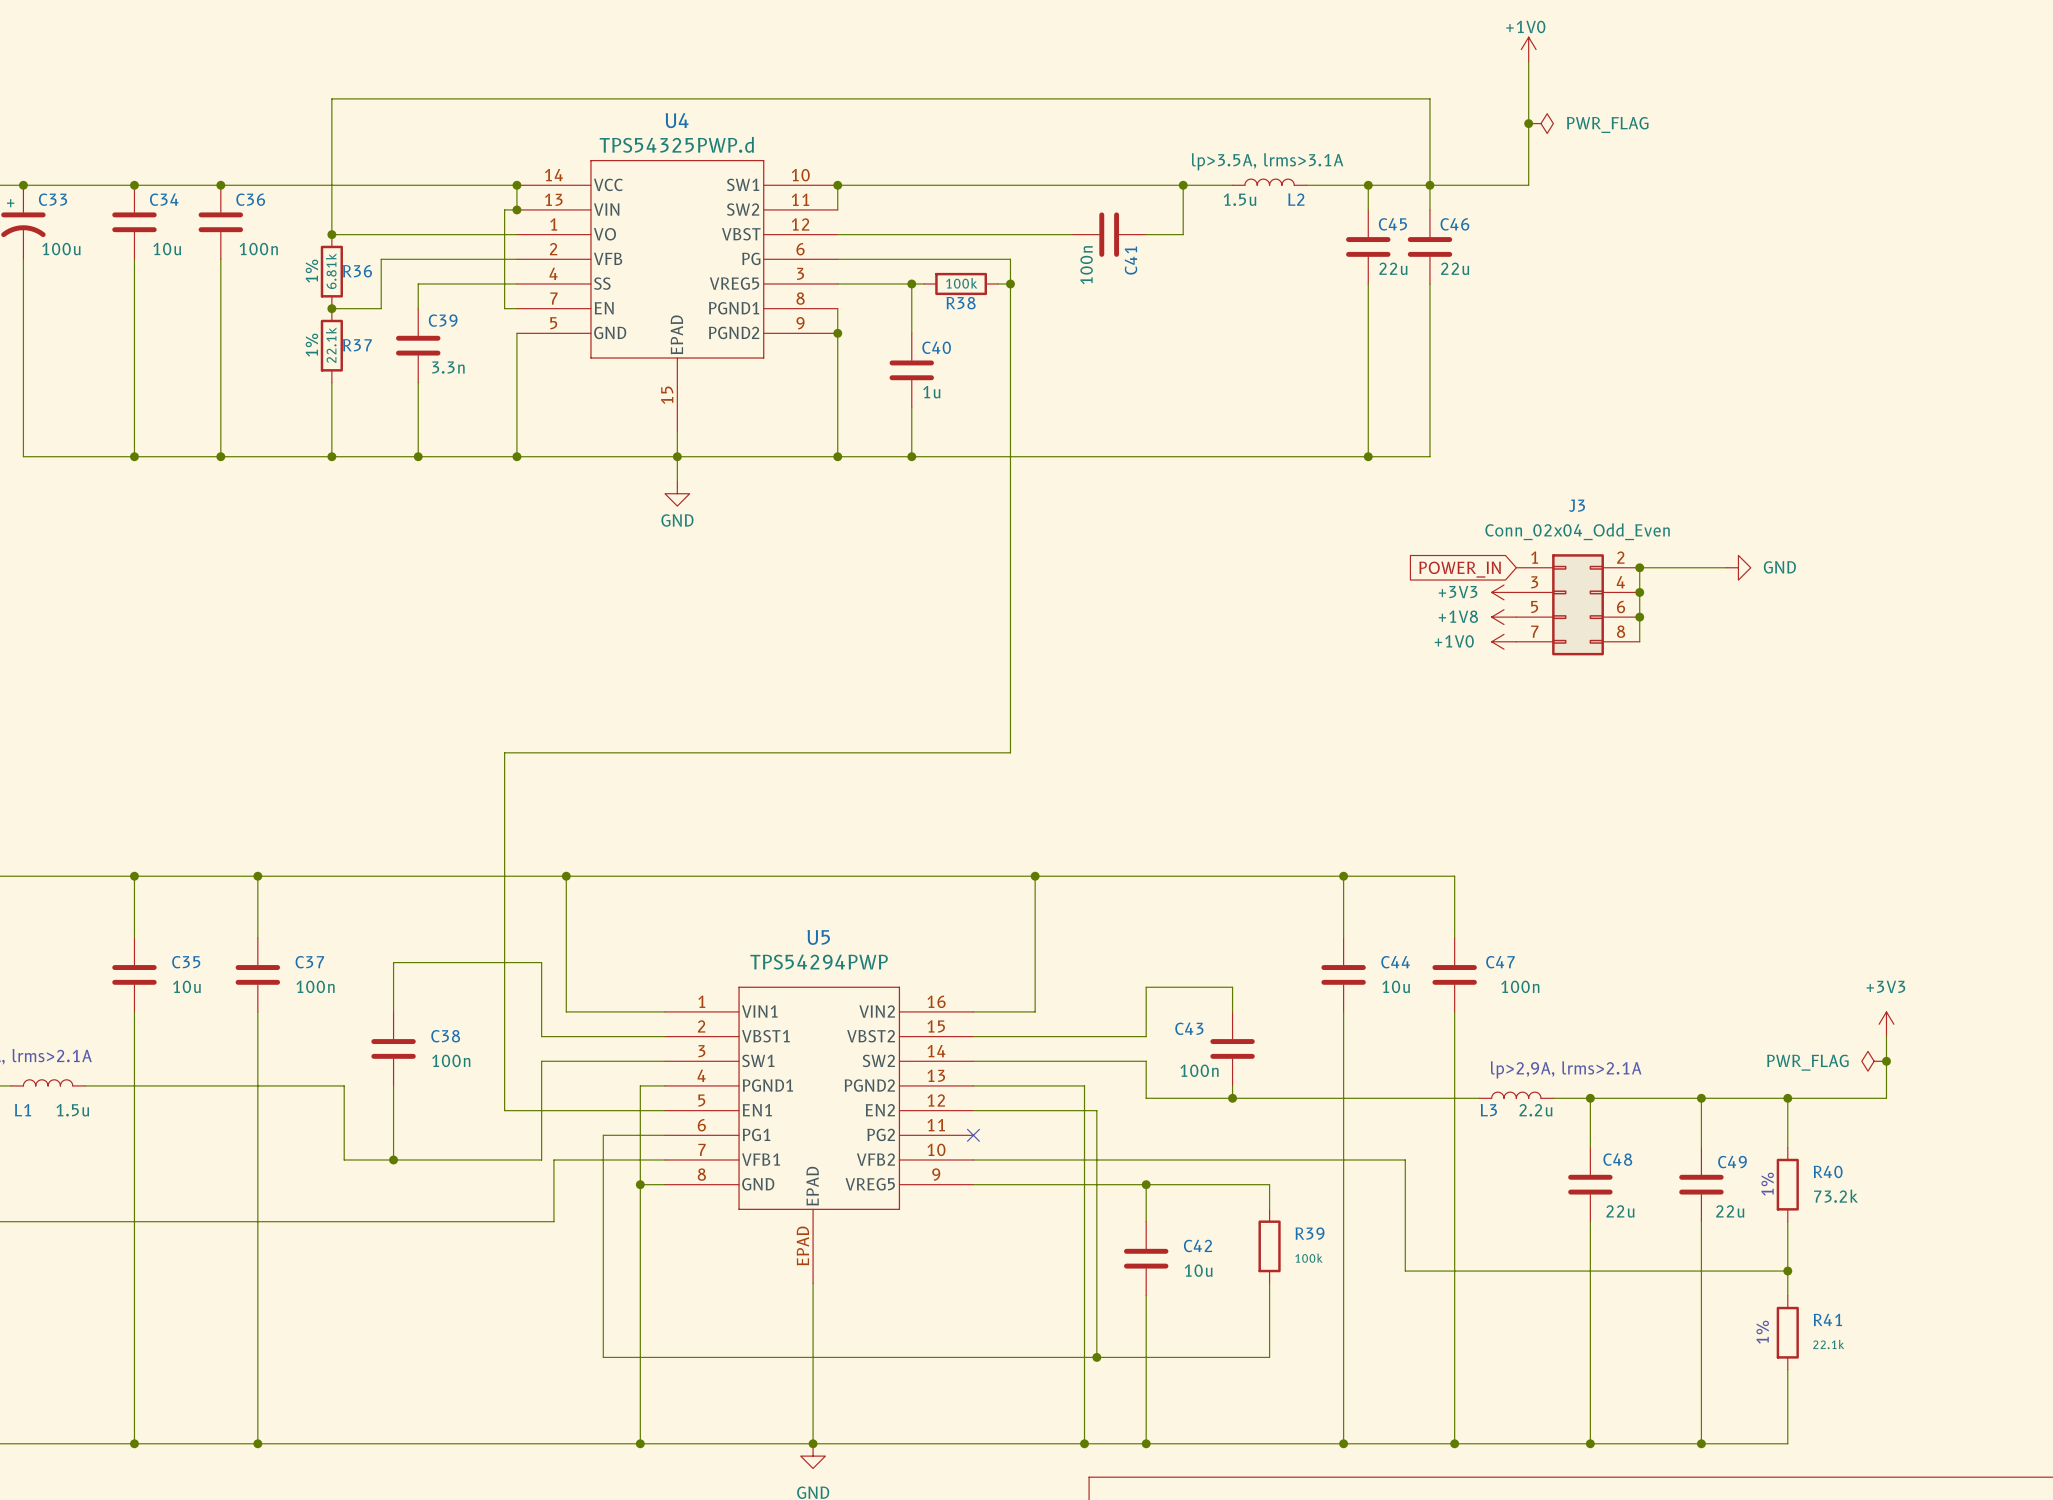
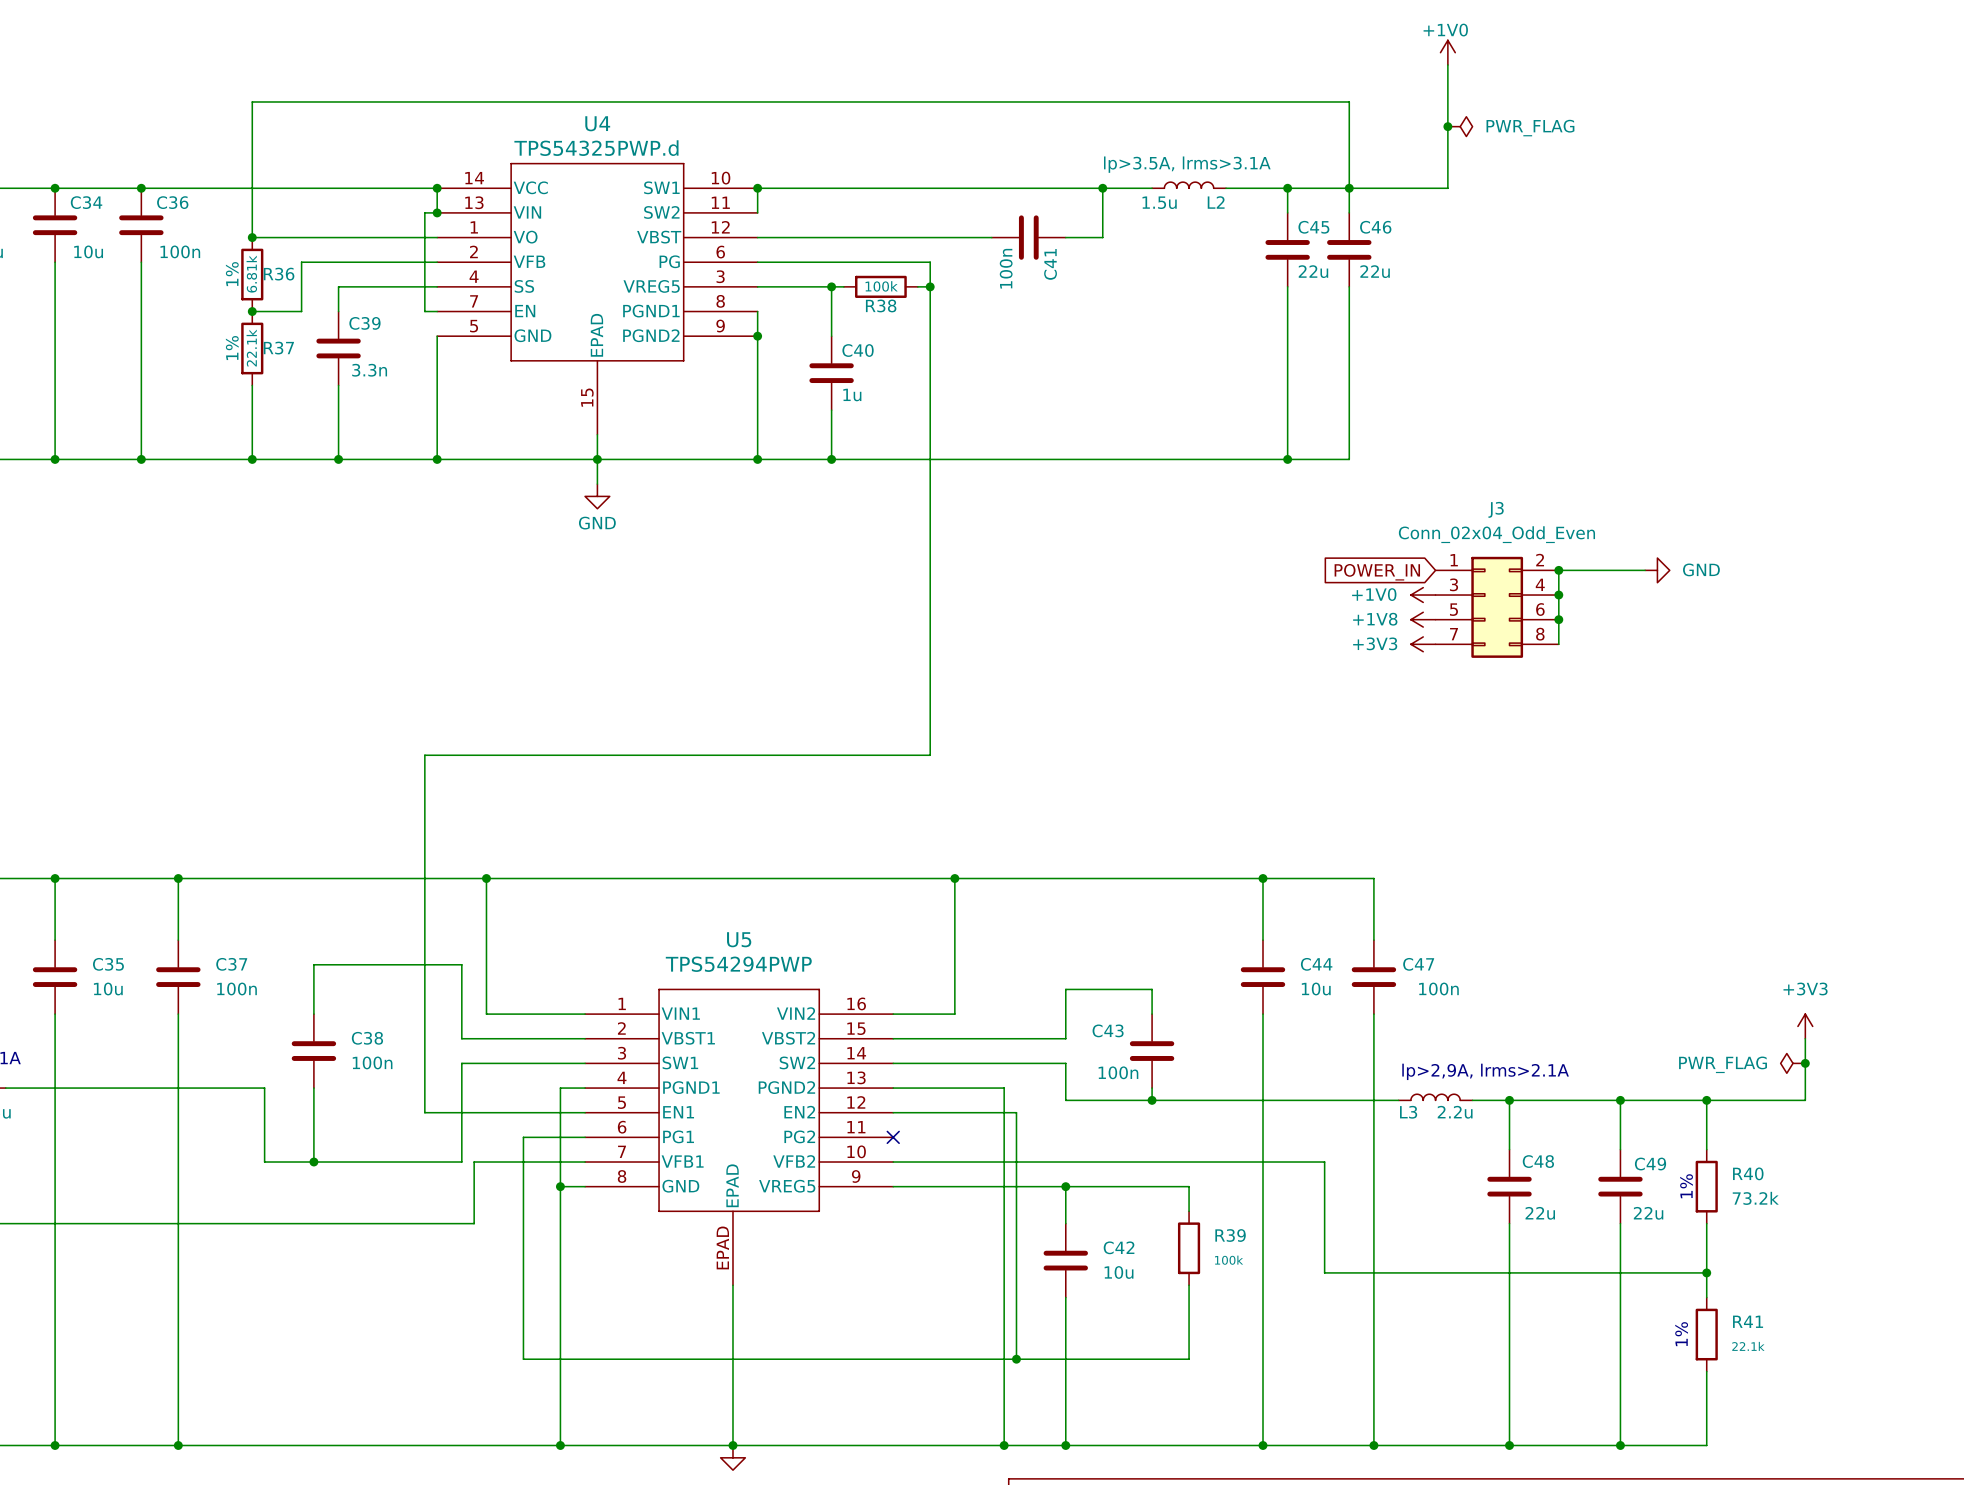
power symbol: +3V3 (1504, 592) -> +1V0 (1423, 595)
power symbol: +1V0 (1504, 641) -> +3V3 (1423, 644)

